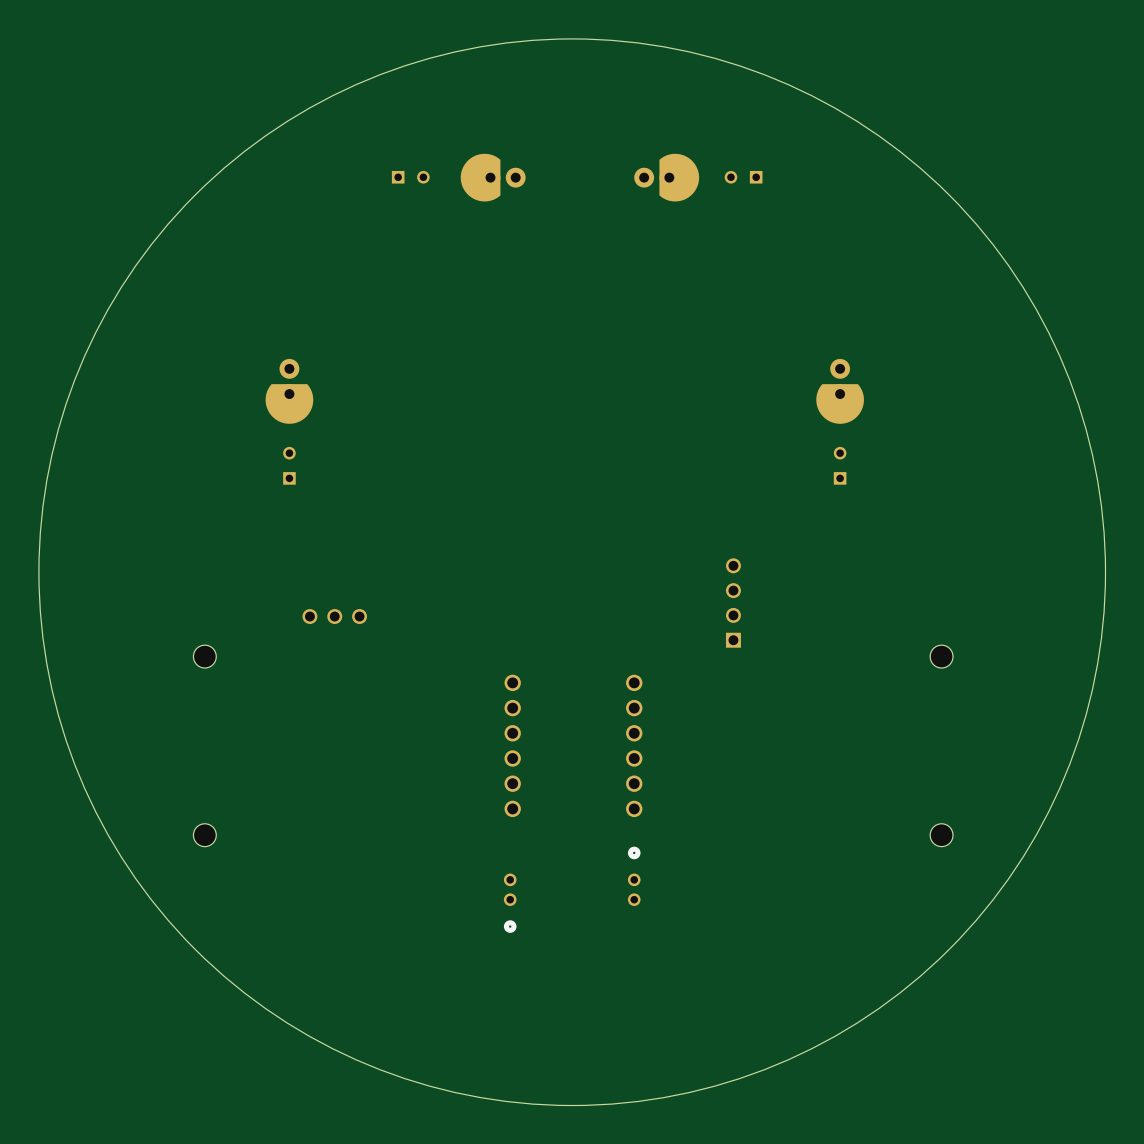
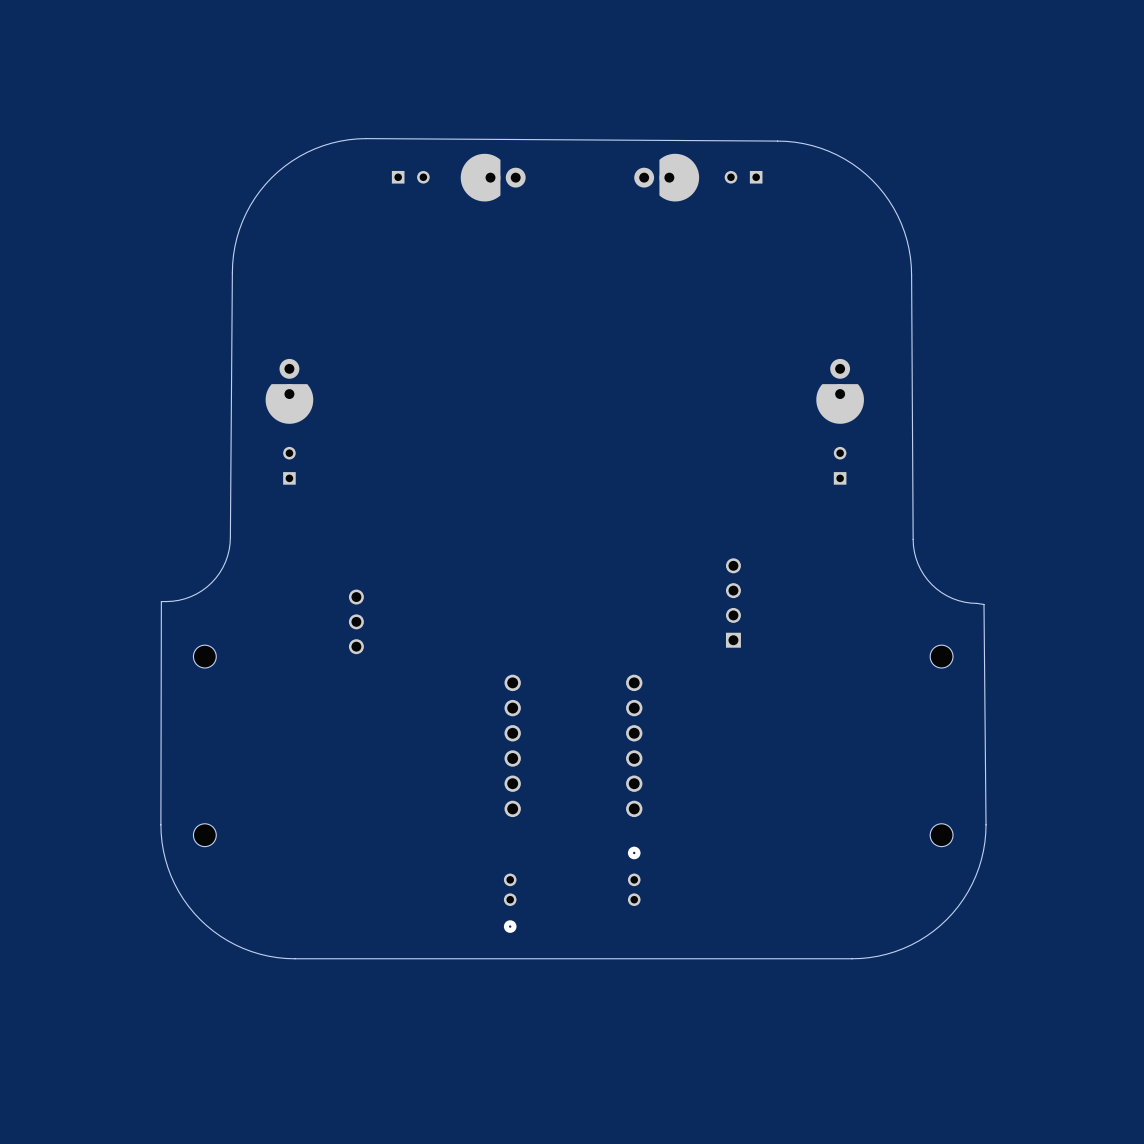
round board edge: [38, 38, 1106, 1106] -> none
board edge: none -> (366, 138) (795, 142) (820, 148) (852, 163) (872, 180) (889, 200) (904, 231) (911, 266) (914, 551) (920, 569) (936, 588) (958, 600) (983, 604) (986, 824) (983, 850) (975, 876) (963, 899) (946, 919) (926, 936) (895, 951) (860, 958) (286, 958) (251, 951) (227, 940) (200, 919) (183, 899) (168, 867) (161, 833) (161, 601) (184, 598) (206, 587) (219, 573) (229, 550) (232, 272) (236, 237) (242, 221) (254, 198) (271, 177) (284, 166) (299, 156) (323, 145) (340, 141) (366, 138)
part rotation: 0° (334, 616) -> 90° clockwise (356, 621)

